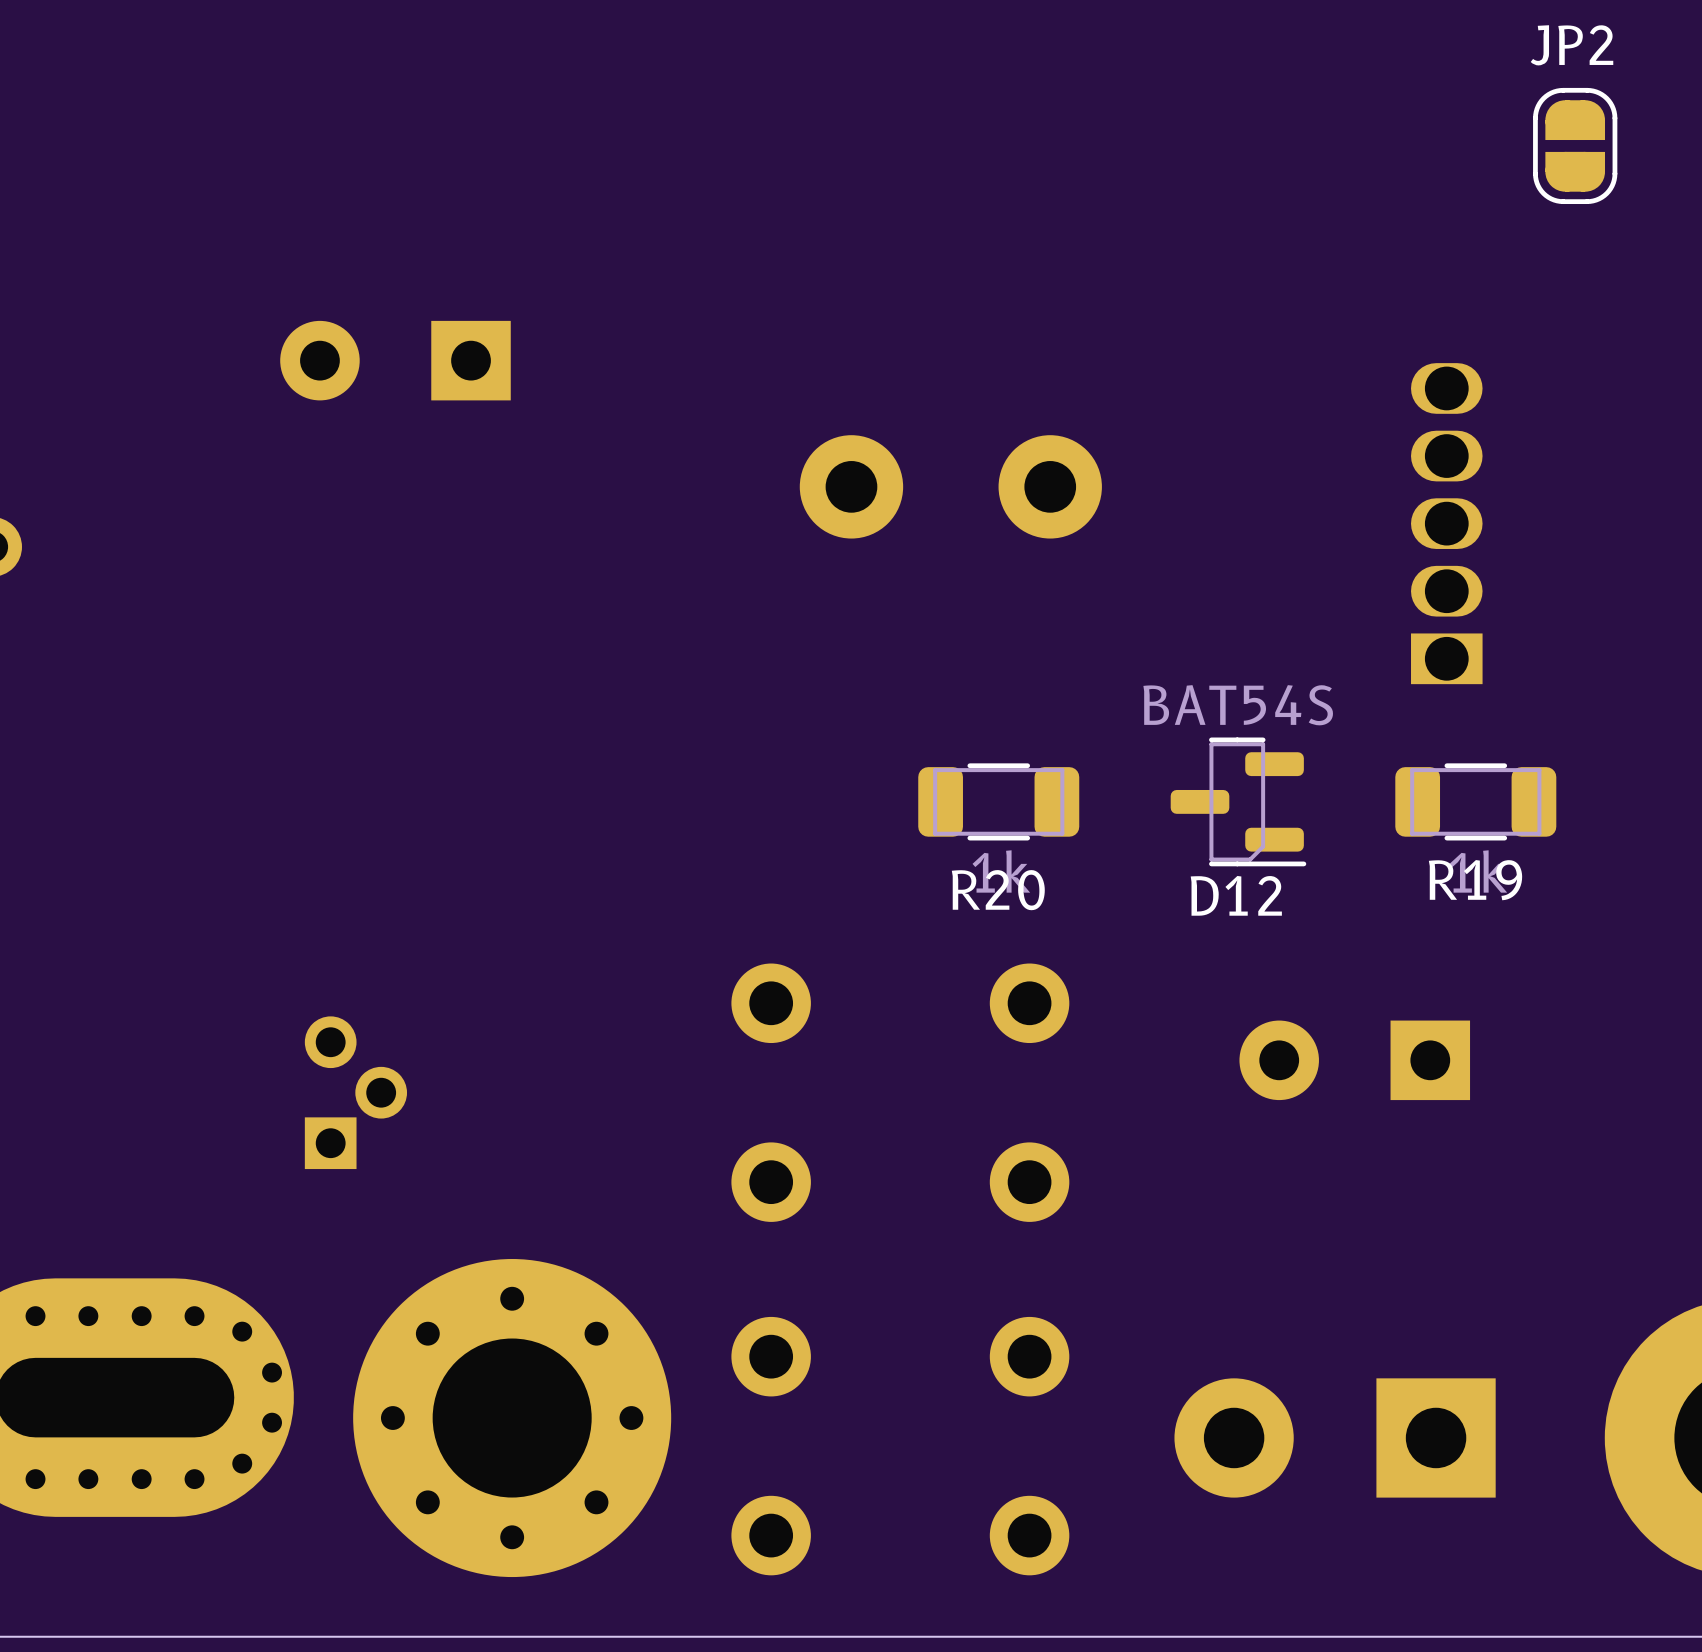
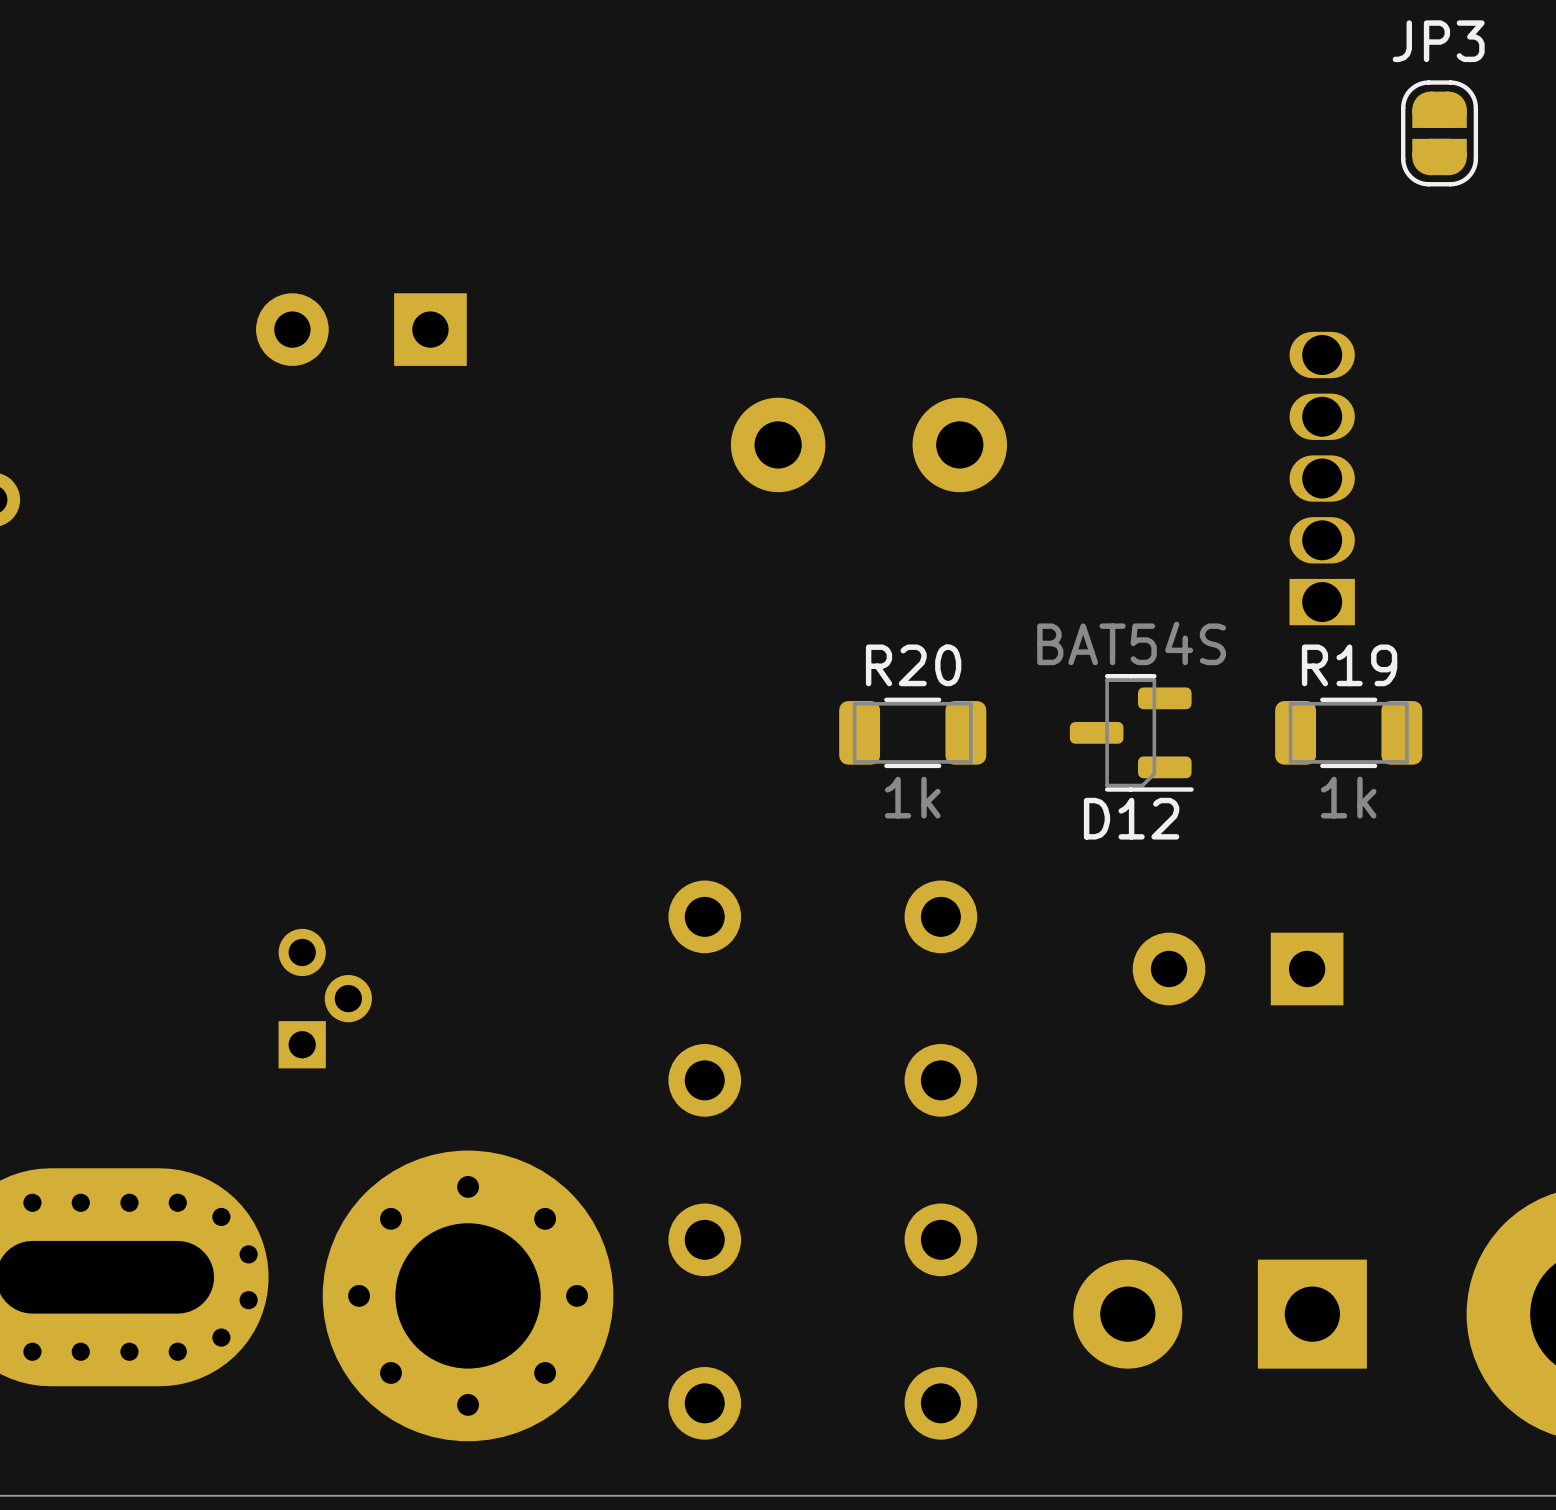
JP2 name: JP2 (1572, 45) -> JP3 (1438, 41)
R19 name position: R19 (1475, 880) -> R19 (1349, 665)
R20 name position: R20 (998, 890) -> R20 (913, 665)

